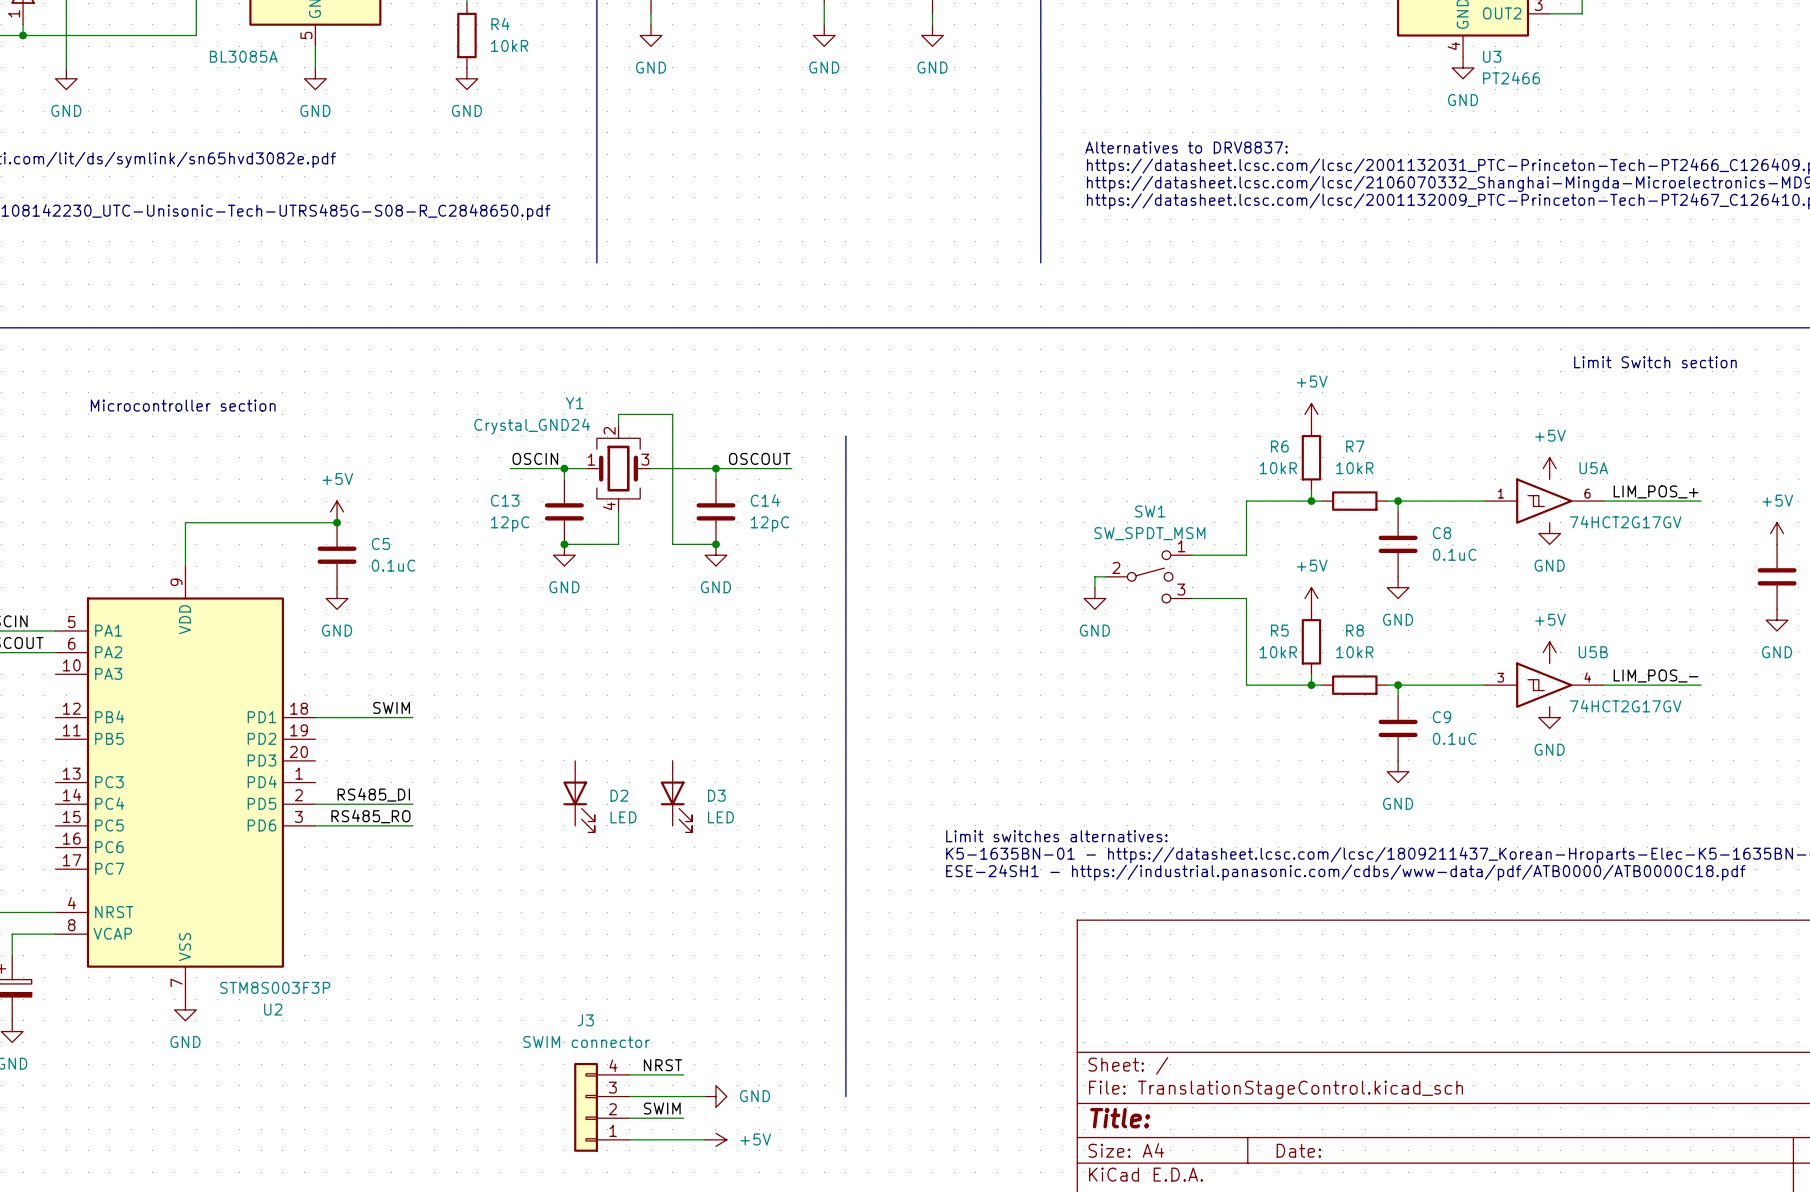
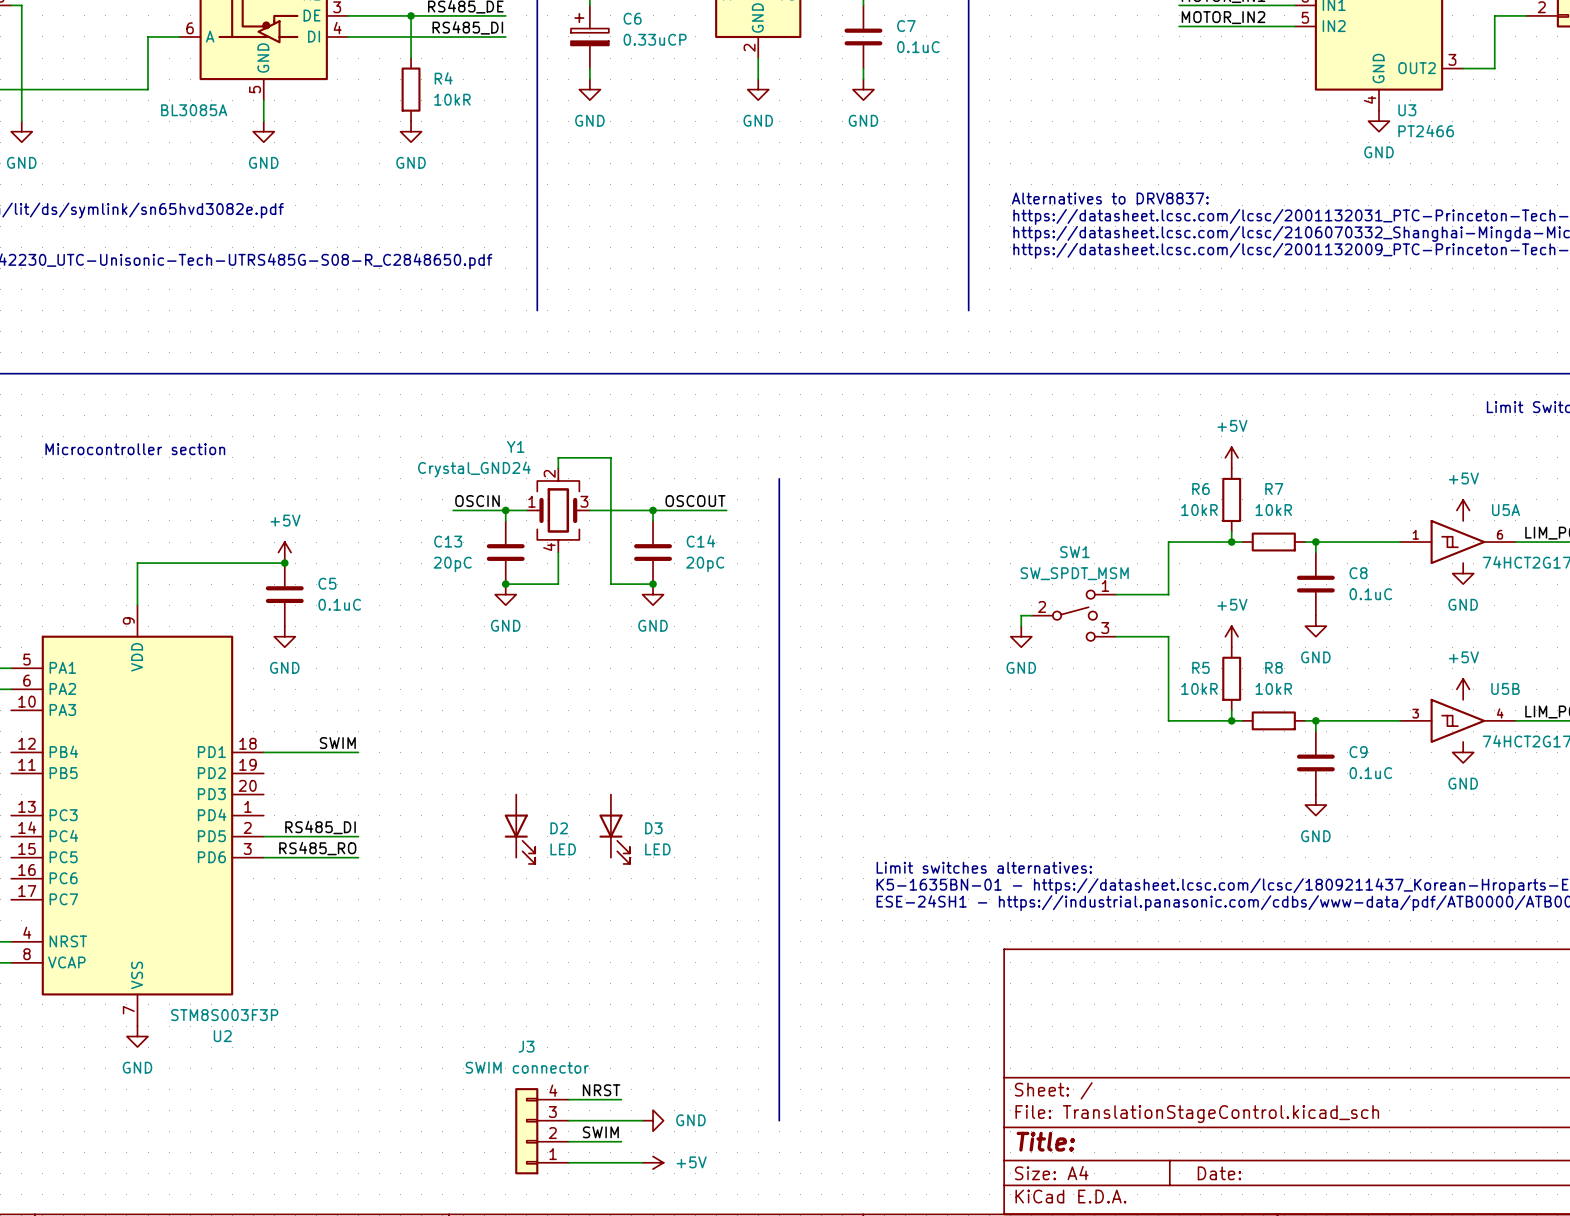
C13 value: 12pC (510, 524) -> 20pC (452, 564)
C14 value: 12pC (769, 524) -> 20pC (705, 564)

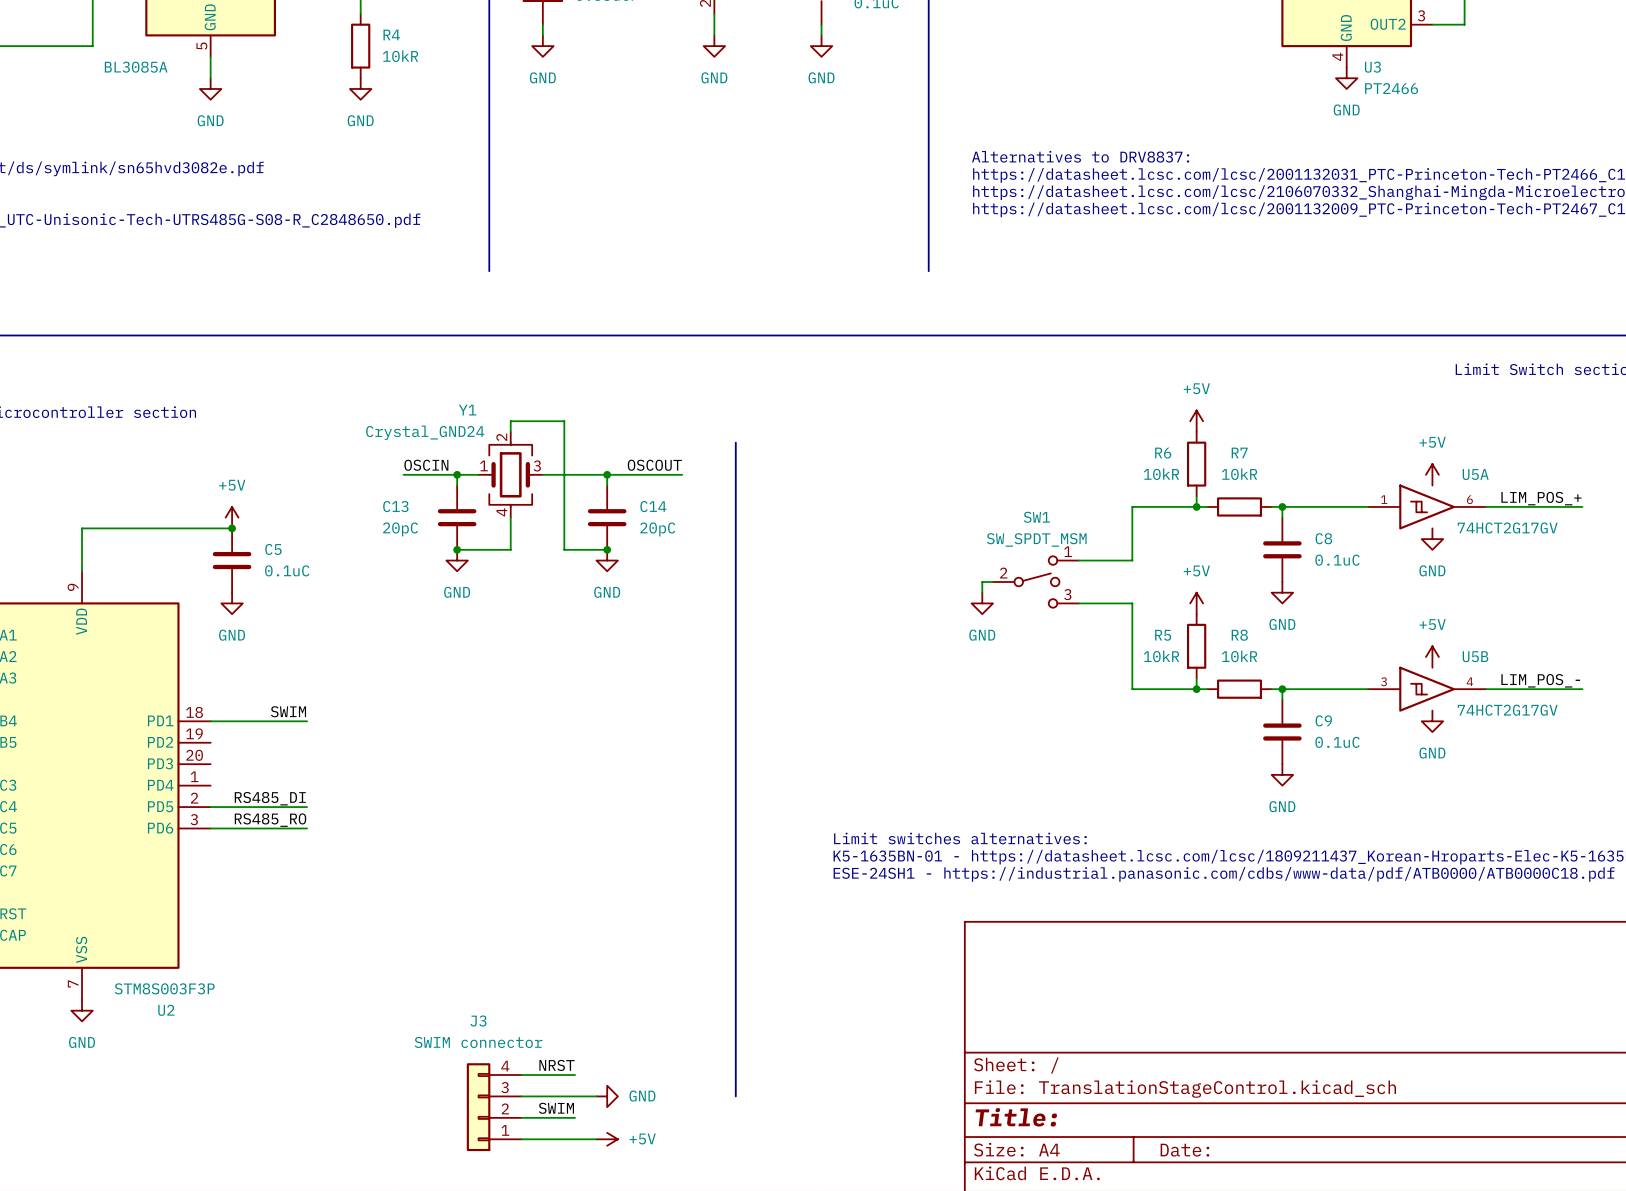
D2: LED (519, 829) -> none
D3: LED (614, 829) -> none

